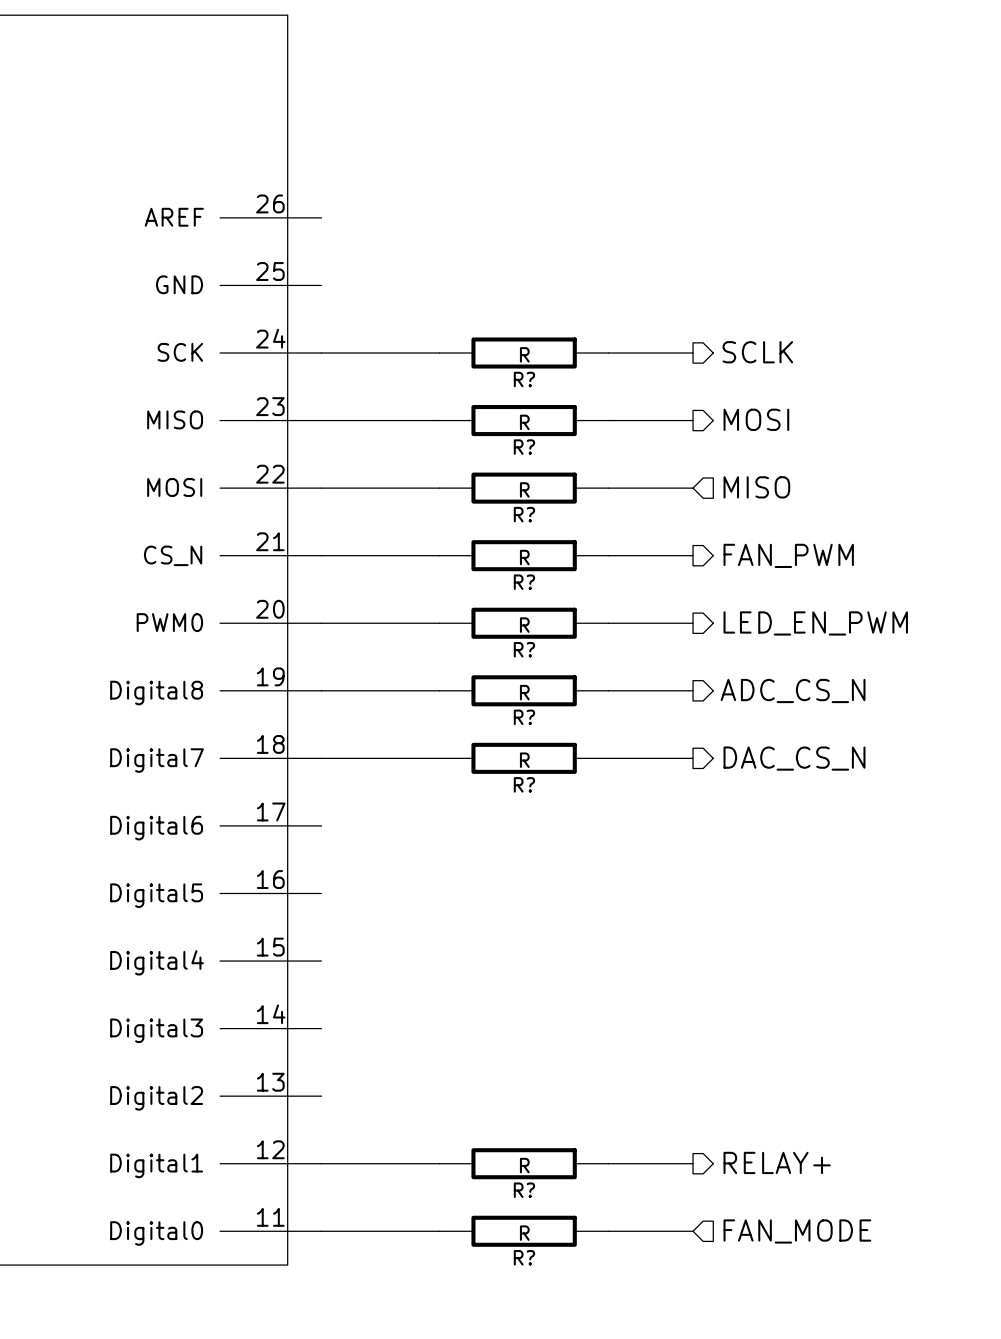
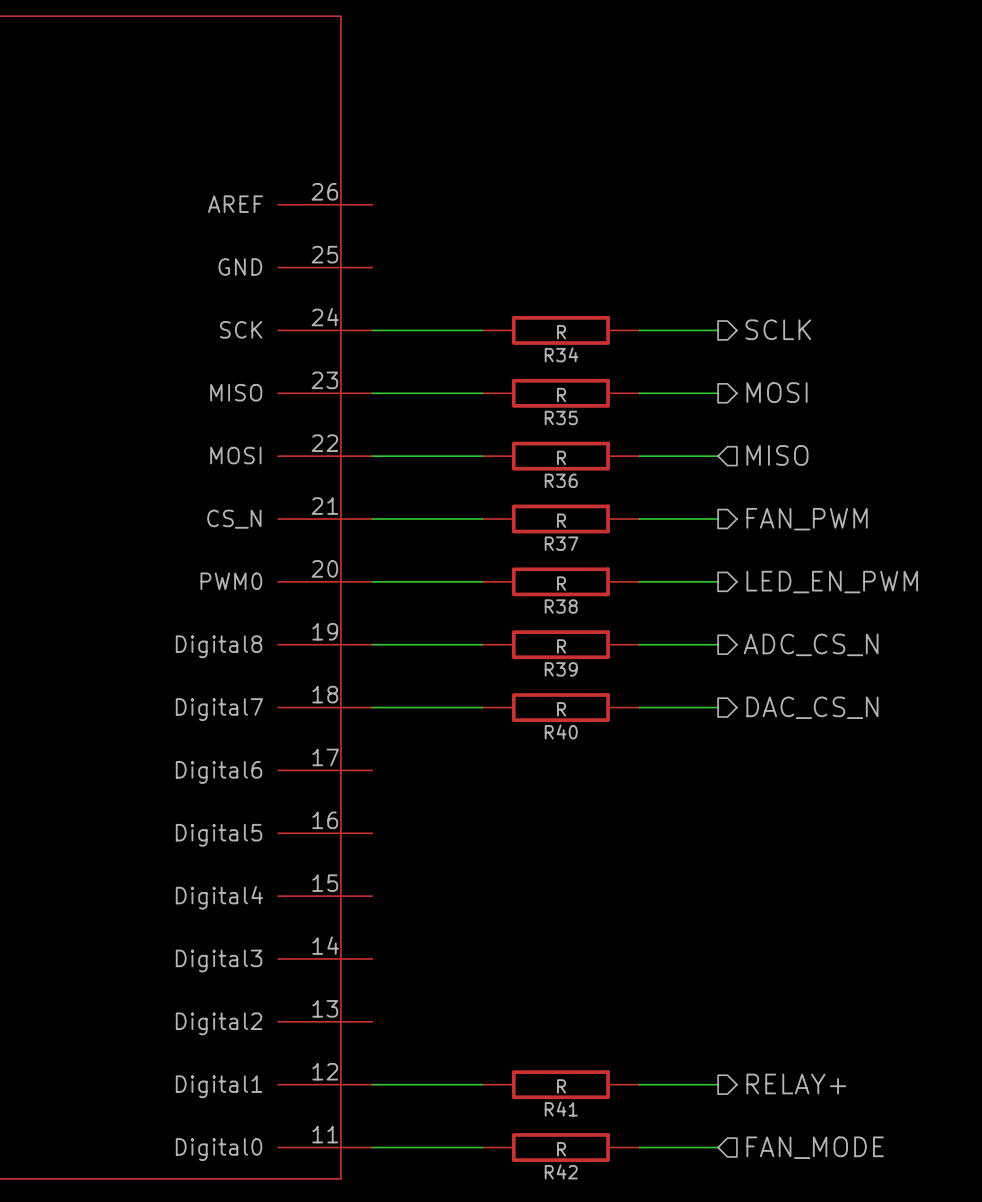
R? name: R? (524, 379) -> R34 (561, 354)
R? name: R? (524, 447) -> R35 (561, 417)
R? name: R? (524, 514) -> R36 (561, 480)
R? name: R? (524, 582) -> R37 (561, 543)
R? name: R? (524, 649) -> R38 (561, 606)
R? name: R? (524, 717) -> R39 (561, 669)
R? name: R? (524, 784) -> R40 (561, 731)
R? name: R? (524, 1190) -> R41 (561, 1109)
R? name: R? (524, 1257) -> R42 (561, 1171)

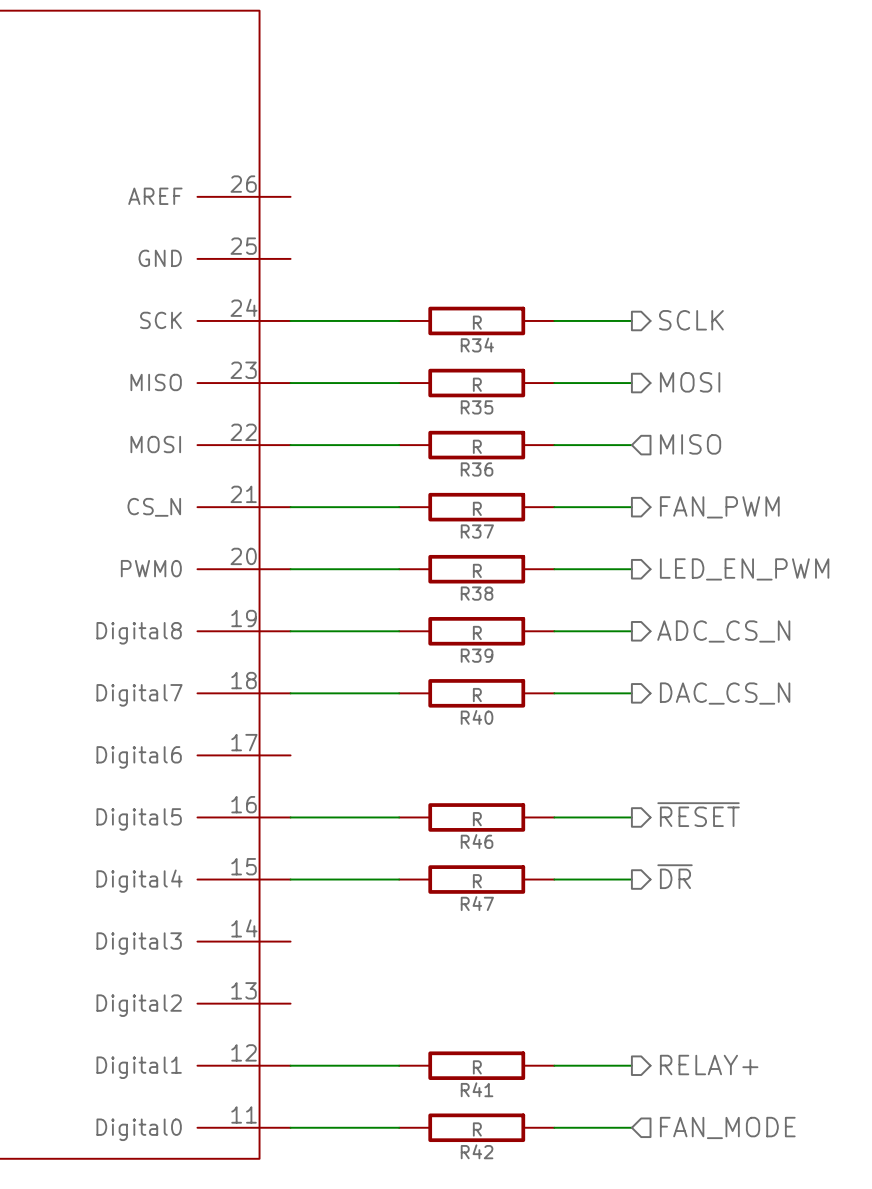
hierarchical label: none -> ~{RESET} (698, 814)
wire: none -> (290, 817) (399, 817)
R46: none -> R (476, 817)
wire: none -> (554, 817) (631, 817)
hierarchical label: none -> ~{DR} (675, 876)
wire: none -> (290, 879) (399, 879)
R47: none -> R (476, 879)
wire: none -> (554, 879) (631, 879)

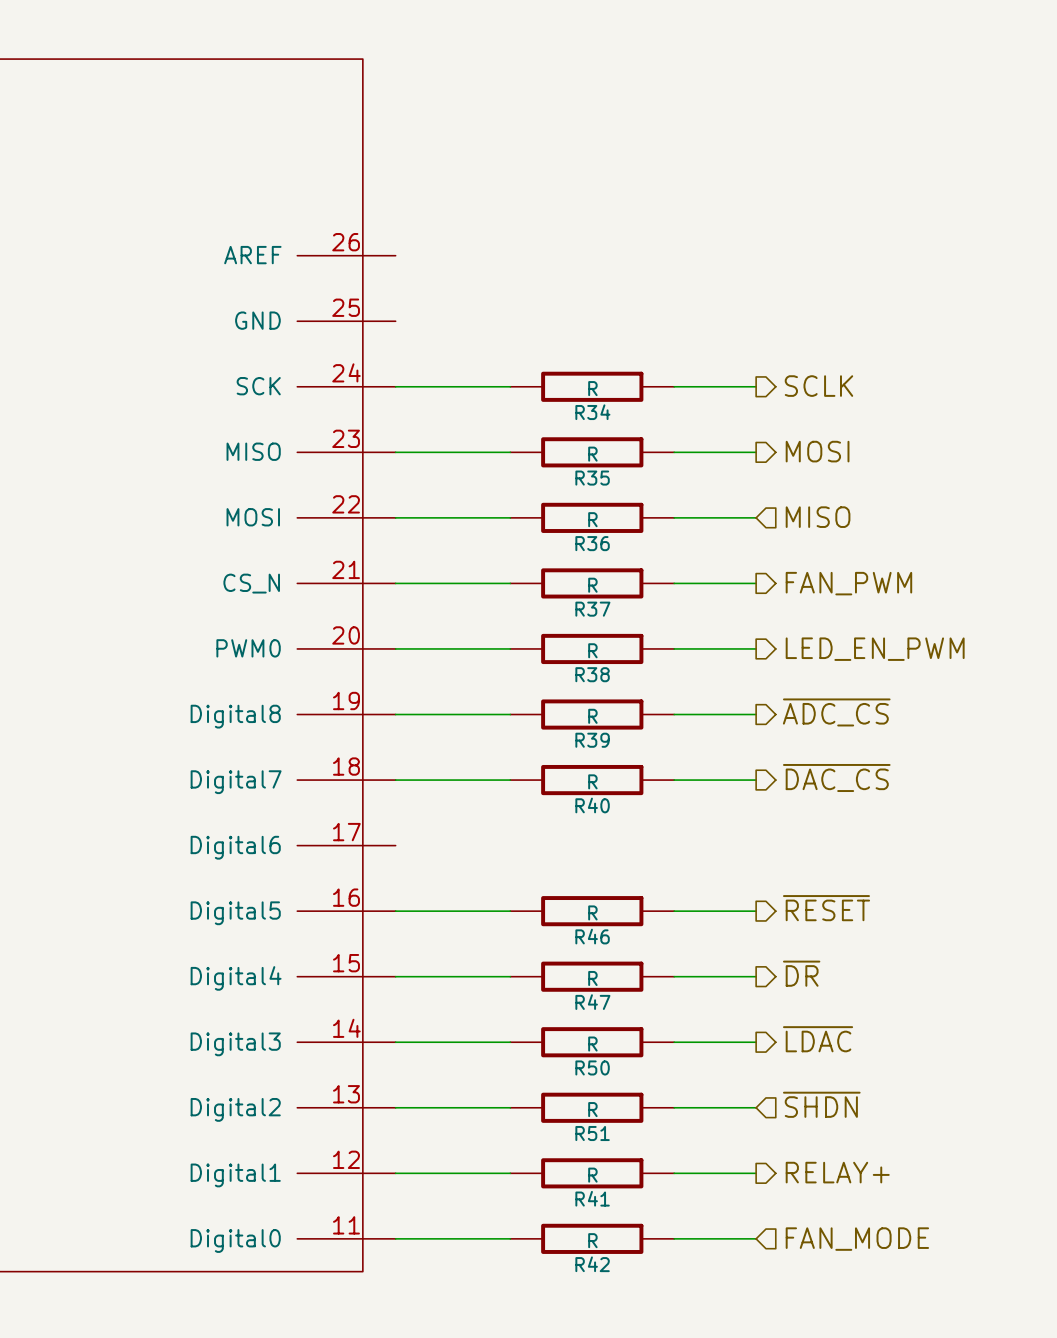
hierarchical label: ADC_CS_N (723, 631) -> ~{ADC_CS} (836, 712)
hierarchical label: DAC_CS_N (725, 693) -> ~{DAC_CS} (836, 777)
hierarchical label: none -> ~{LDAC} (818, 1039)
wire: none -> (395, 1042) (510, 1042)
R50: none -> R (592, 1042)
wire: none -> (674, 1042) (756, 1042)
hierarchical label: none -> ~{SHDN} (821, 1104)
wire: none -> (395, 1107) (510, 1107)
R51: none -> R (592, 1107)
wire: none -> (674, 1107) (756, 1107)

